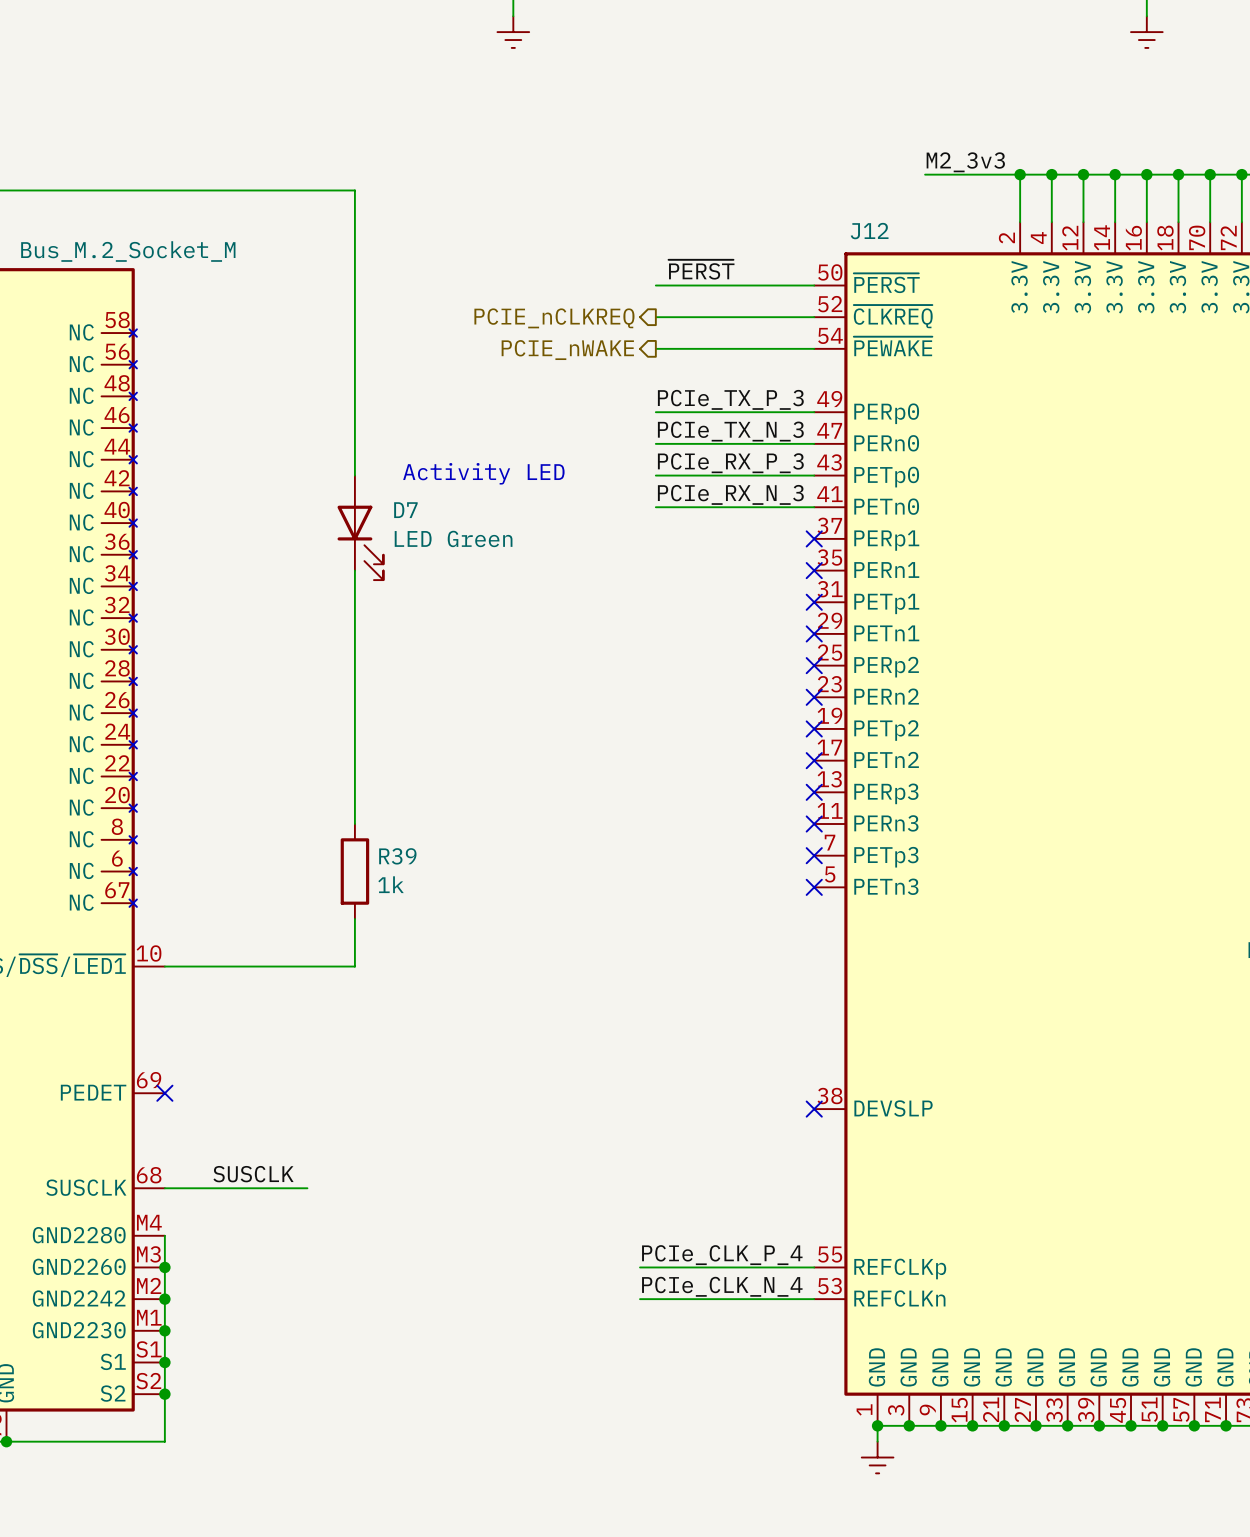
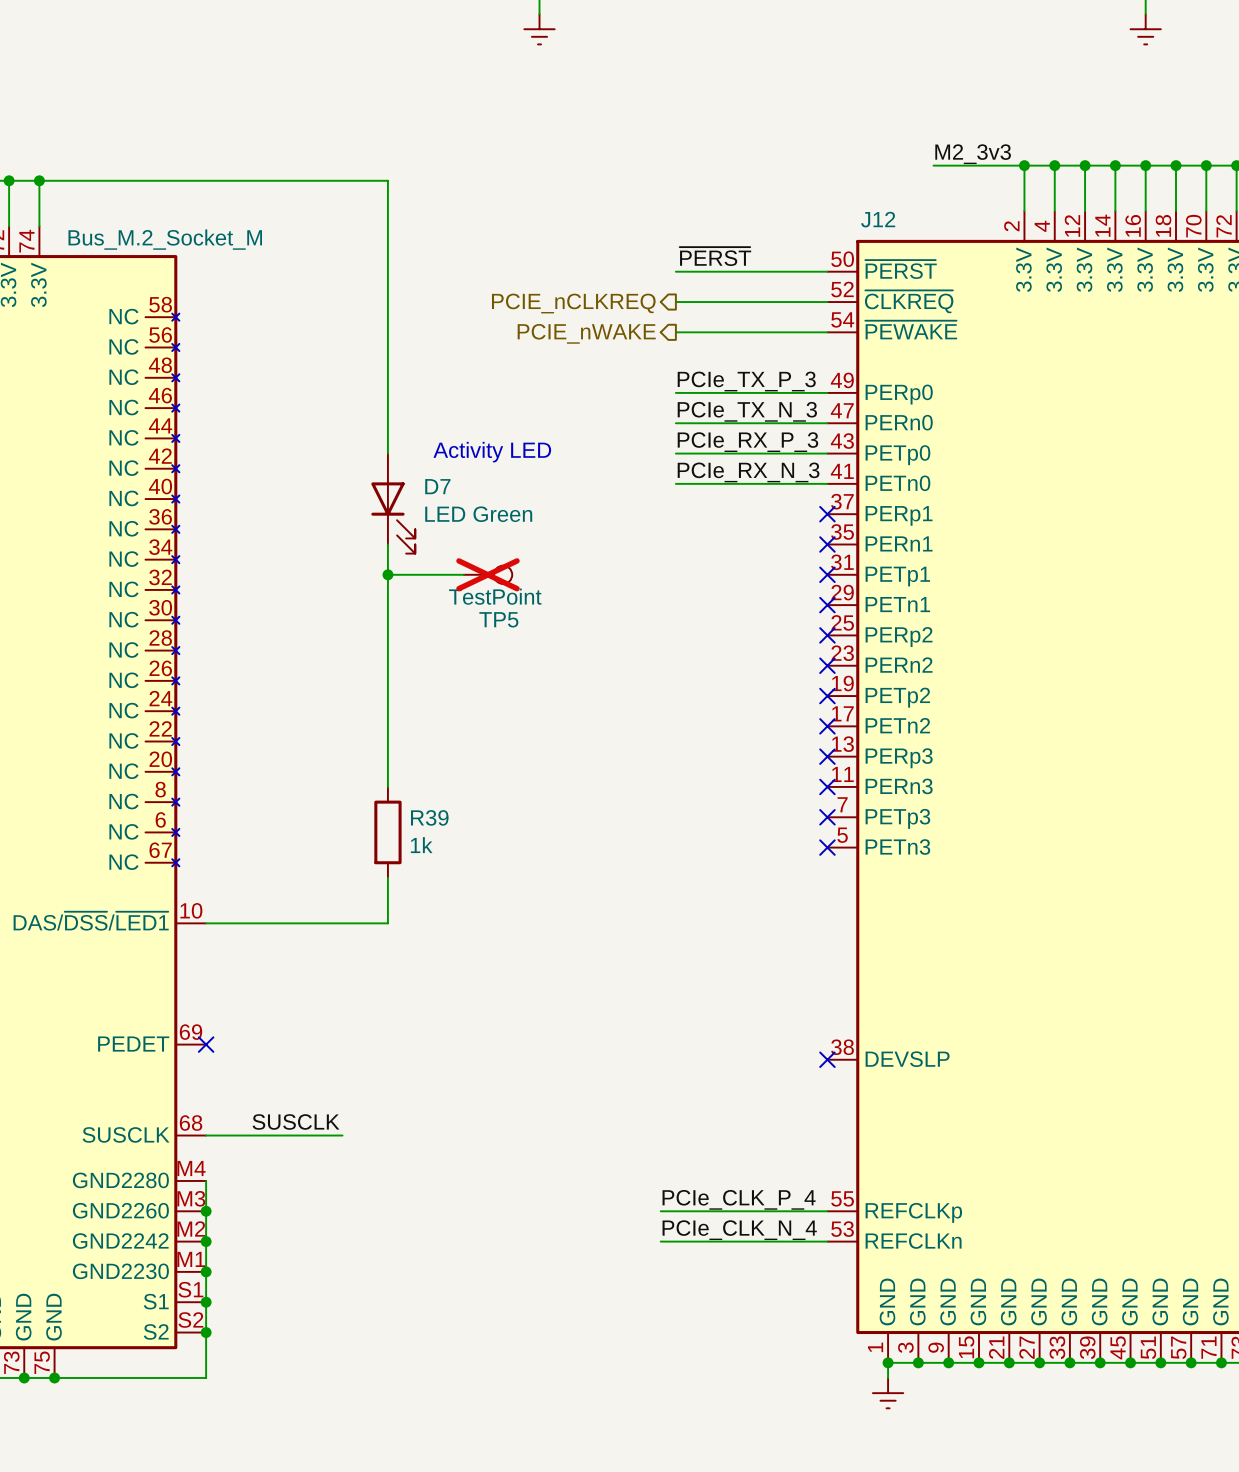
wire: none -> (387, 574) (463, 574)
junction: none -> (387, 574)
TP5: none -> TestPoint (487, 574)

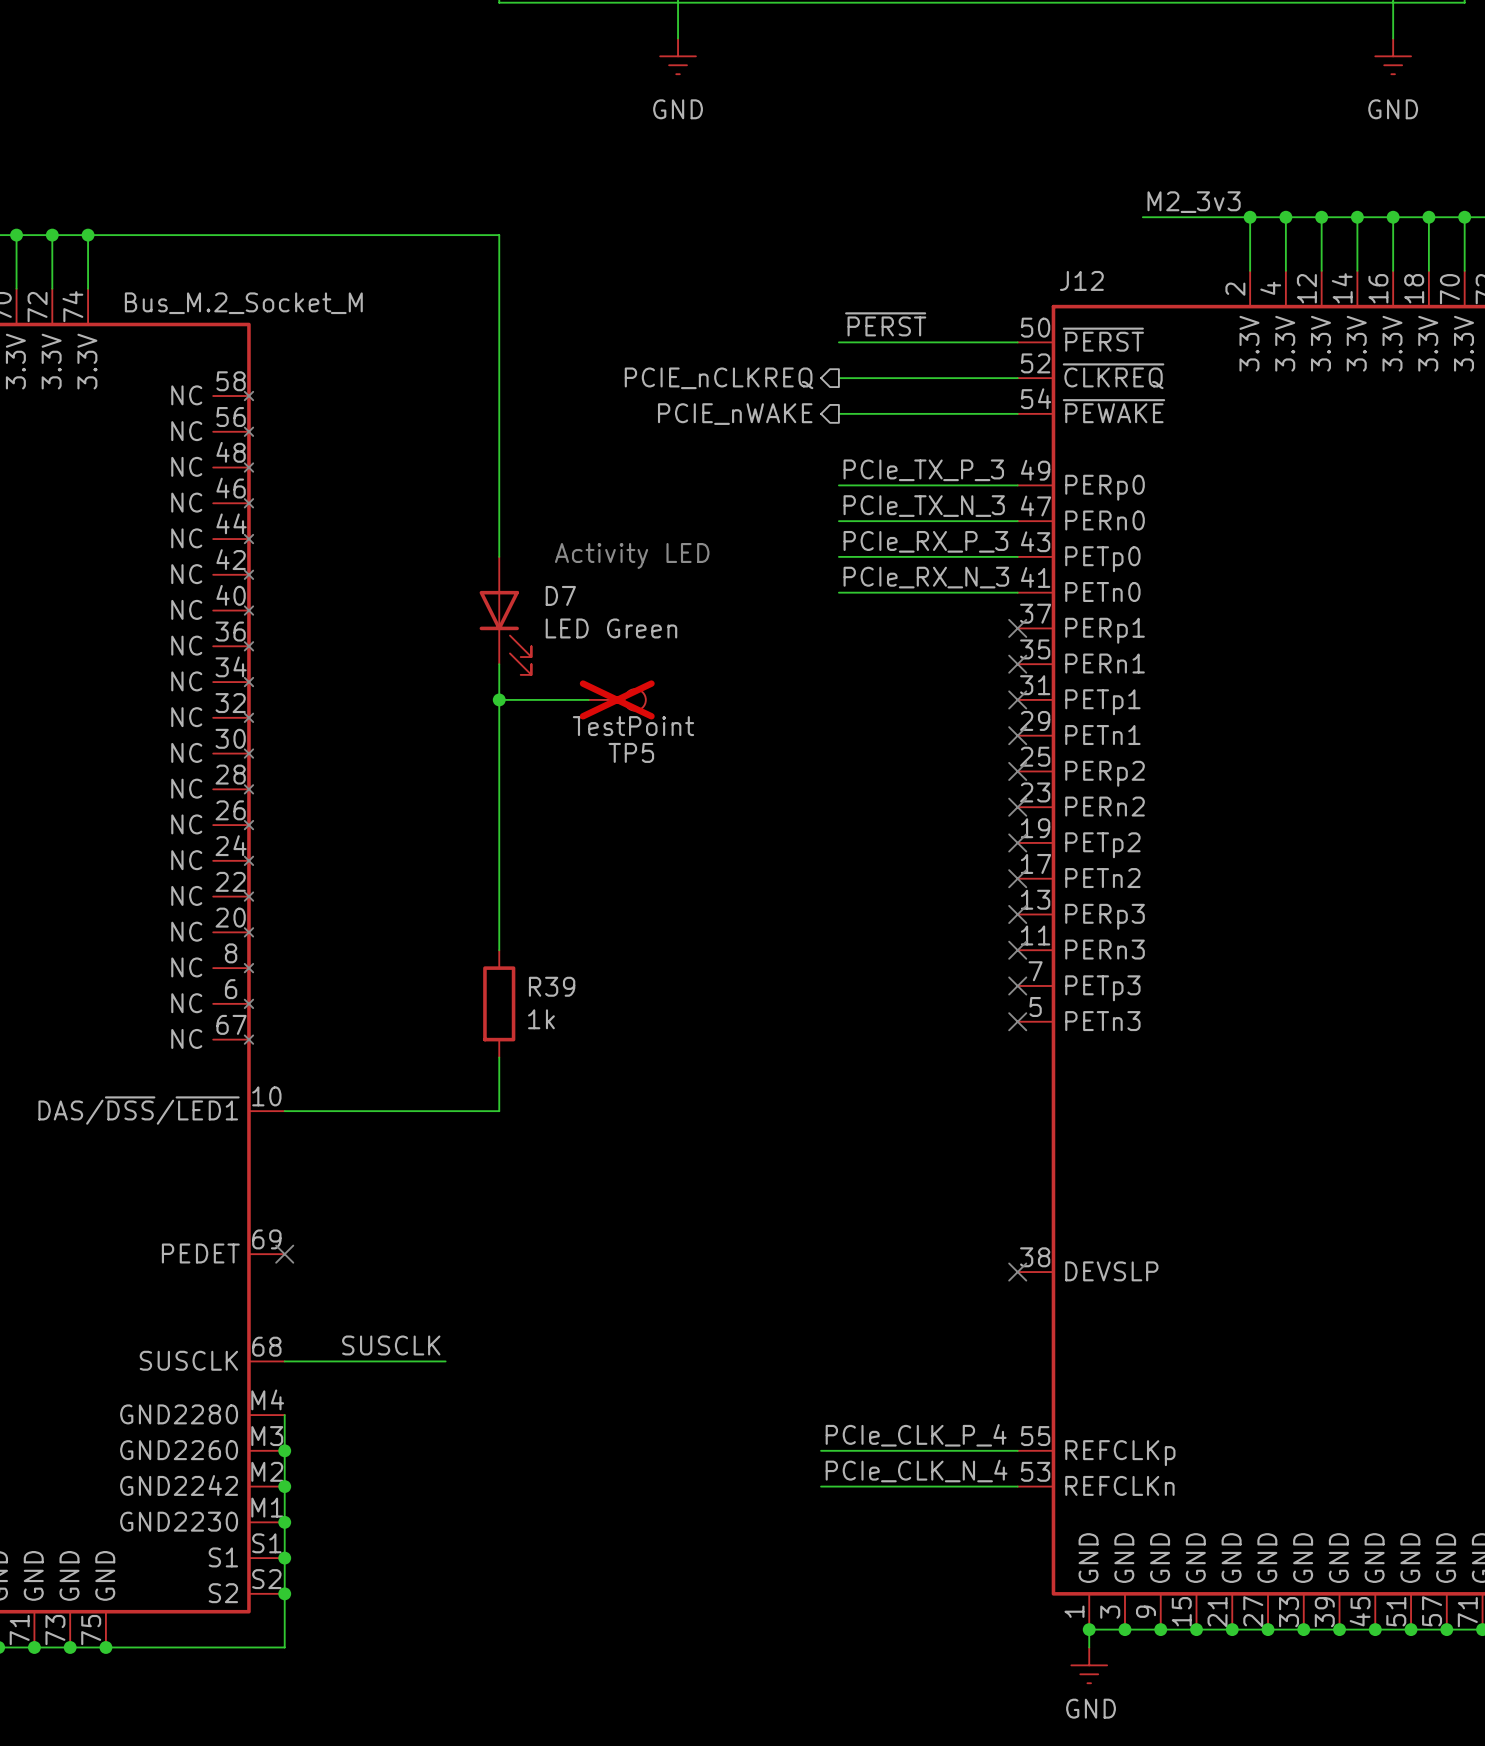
power symbol text: none -> GND (678, 109)
power symbol text: none -> GND (1393, 109)
power symbol text: none -> GND (1091, 1708)

